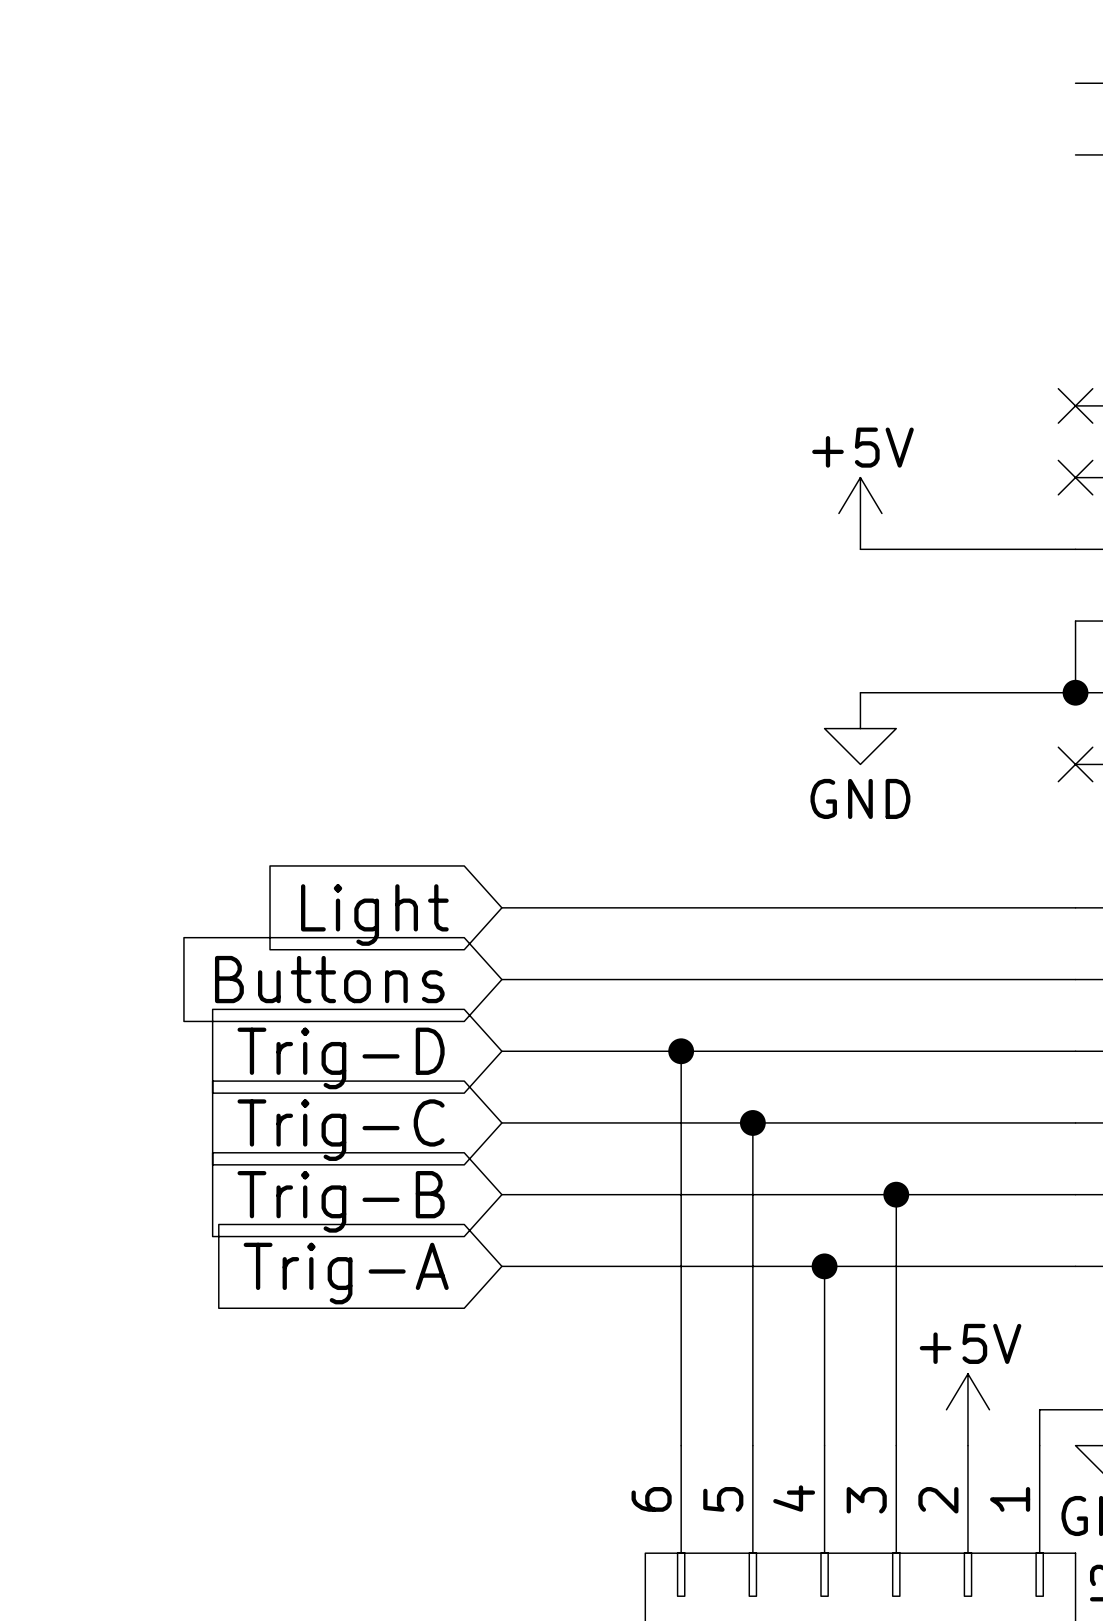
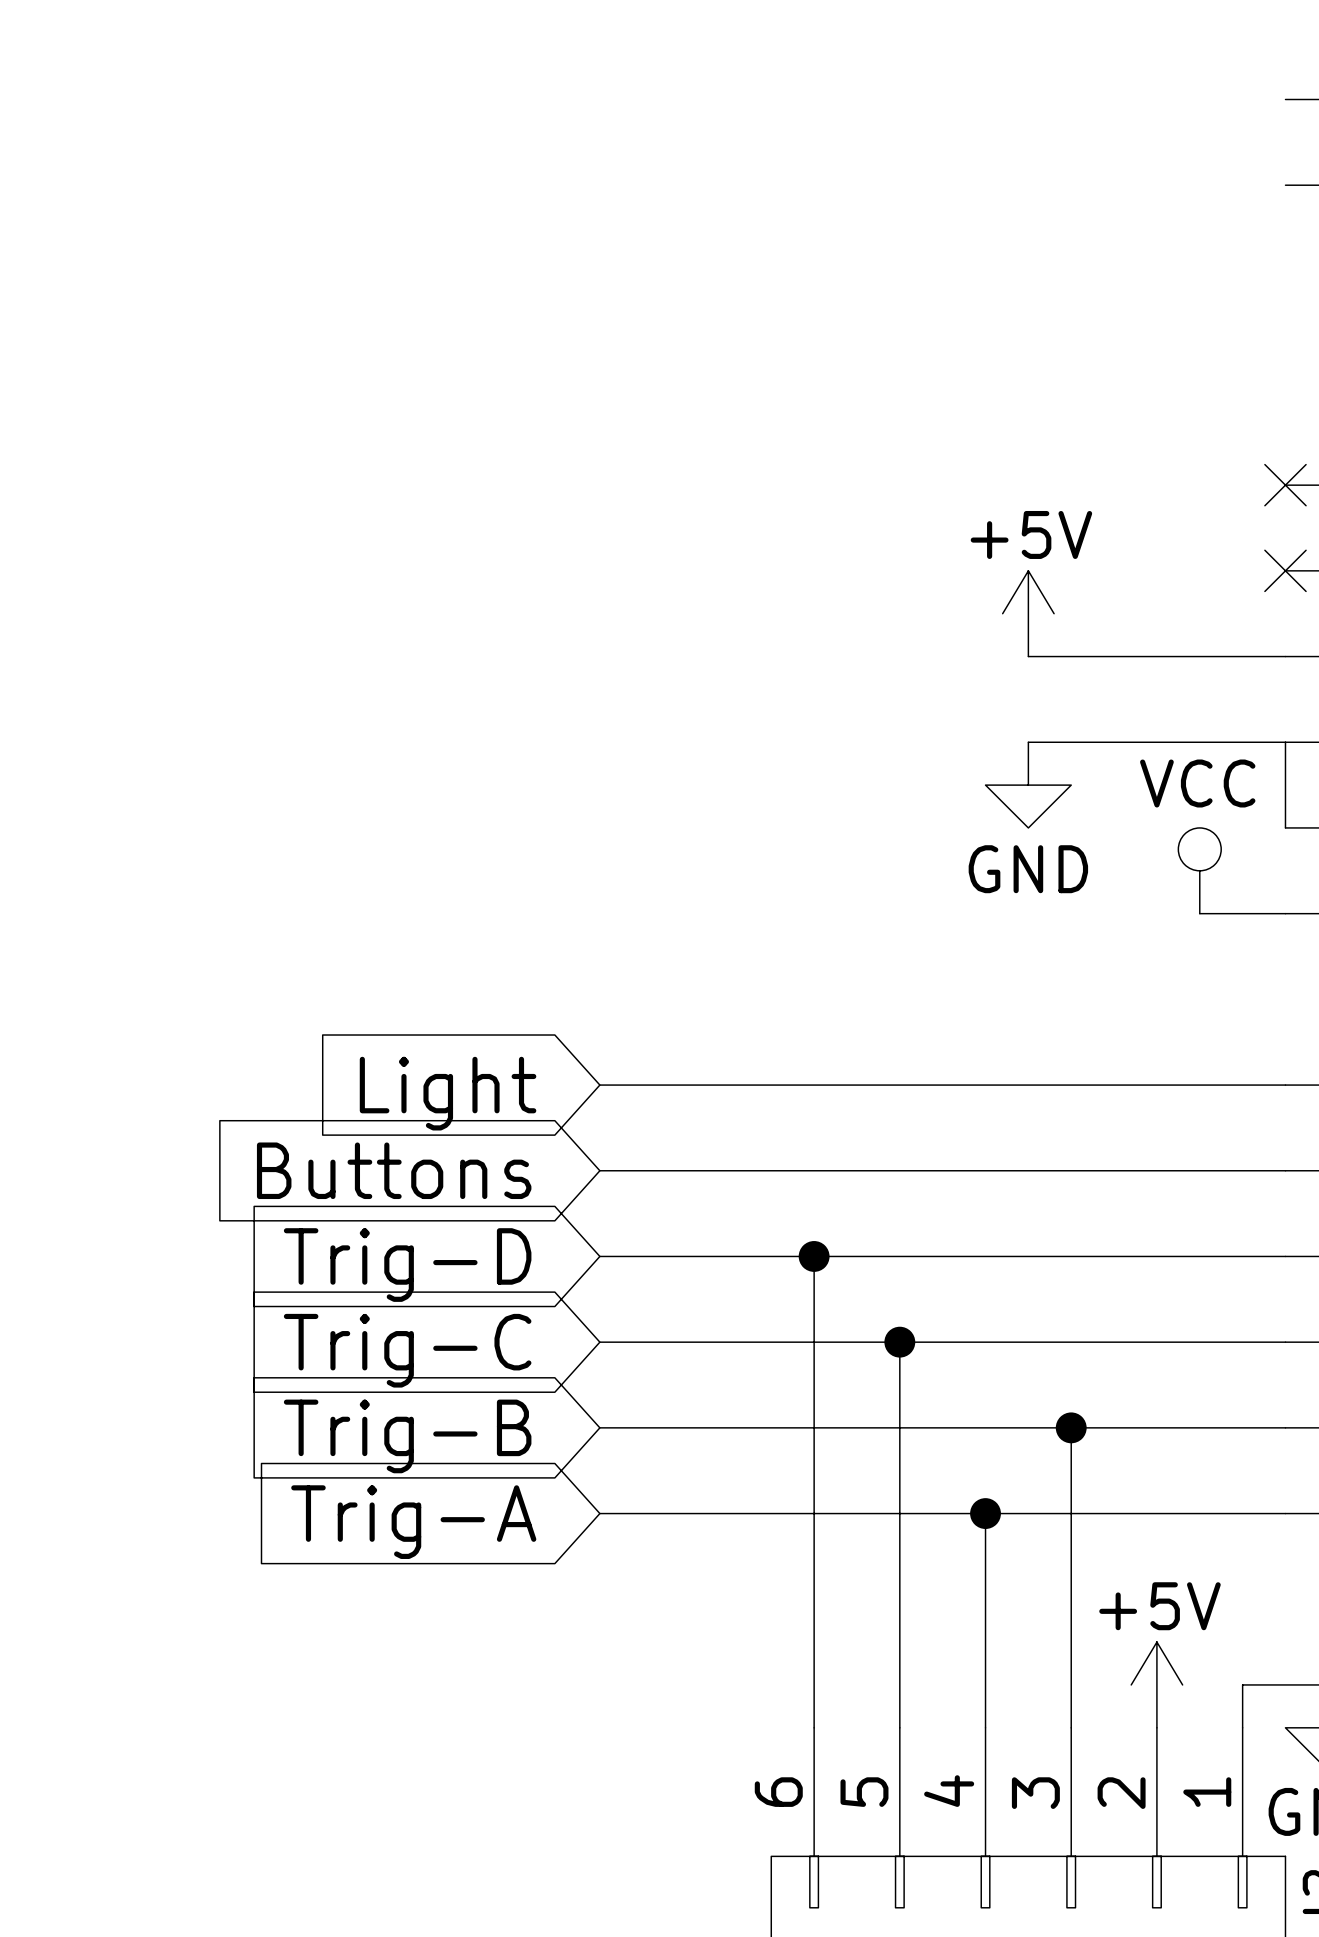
wire: (860, 692) (1075, 692) -> (1028, 742) (1285, 742)
junction: (1075, 692) -> none
power symbol position: GND (860, 728) -> GND (1028, 785)
power symbol: none -> VCC (1199, 870)
wire: none -> (1199, 913) (1285, 913)
no-connect mark: (1075, 764) -> none

